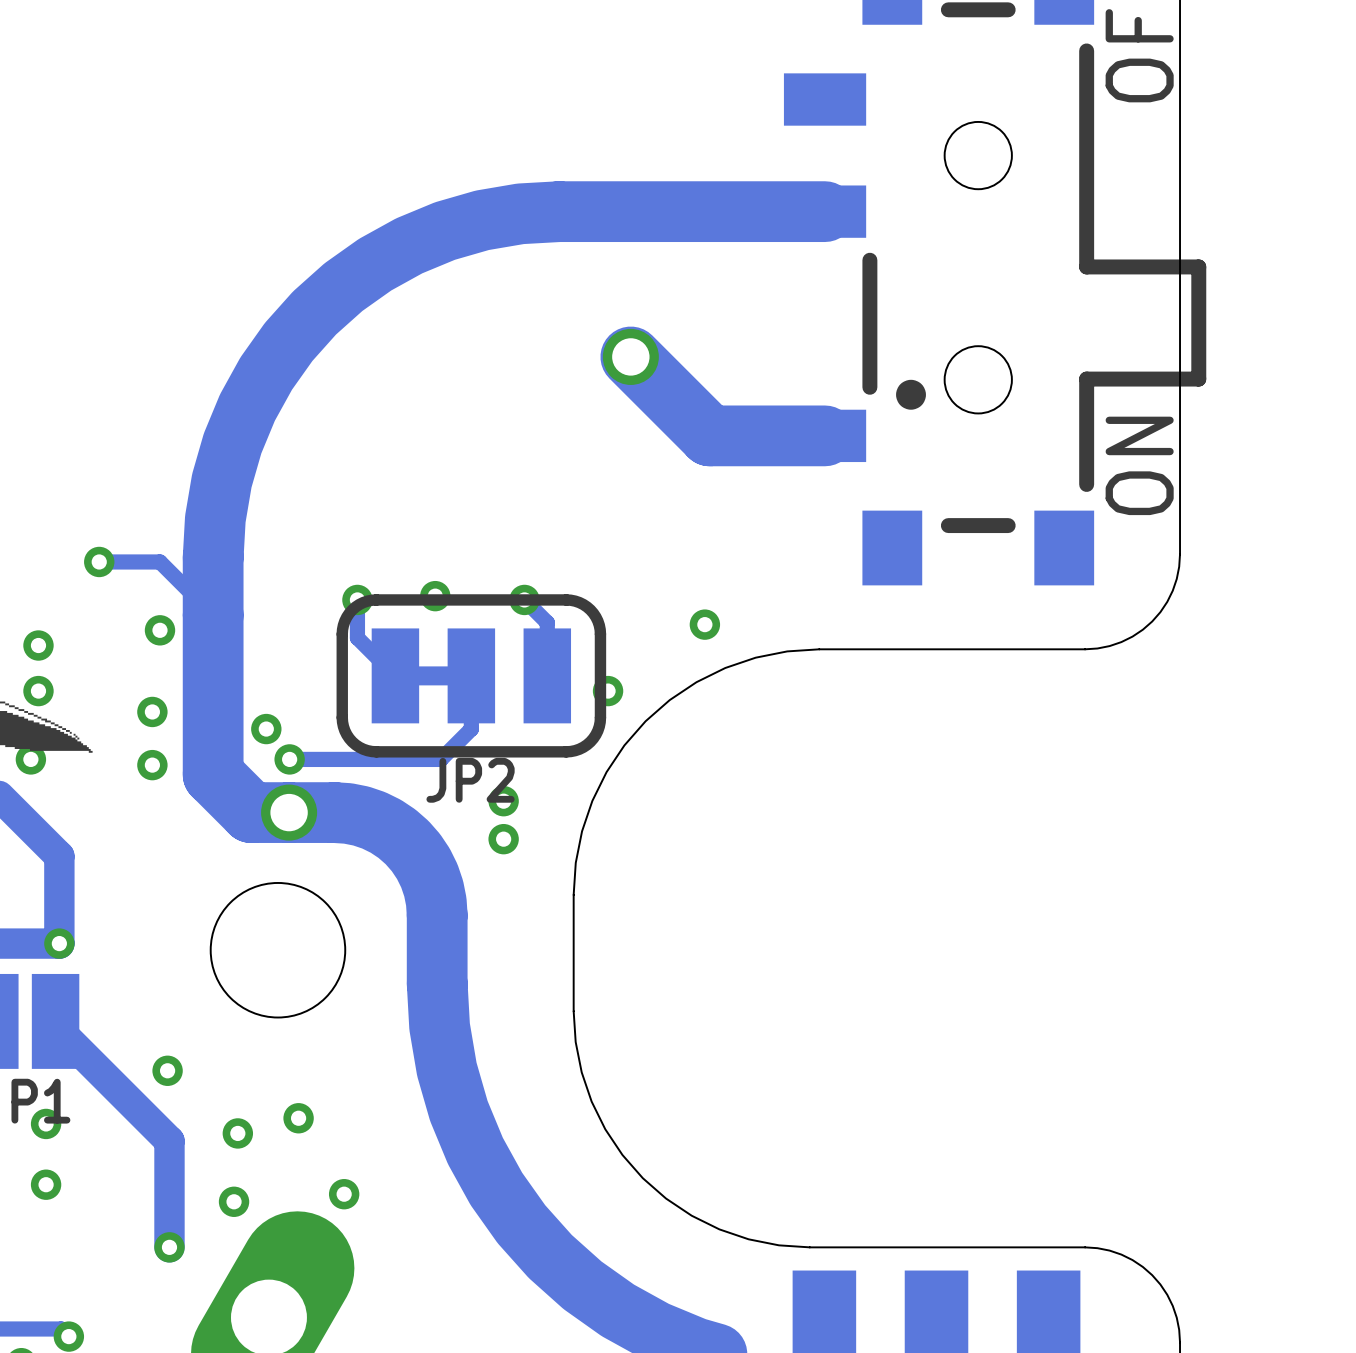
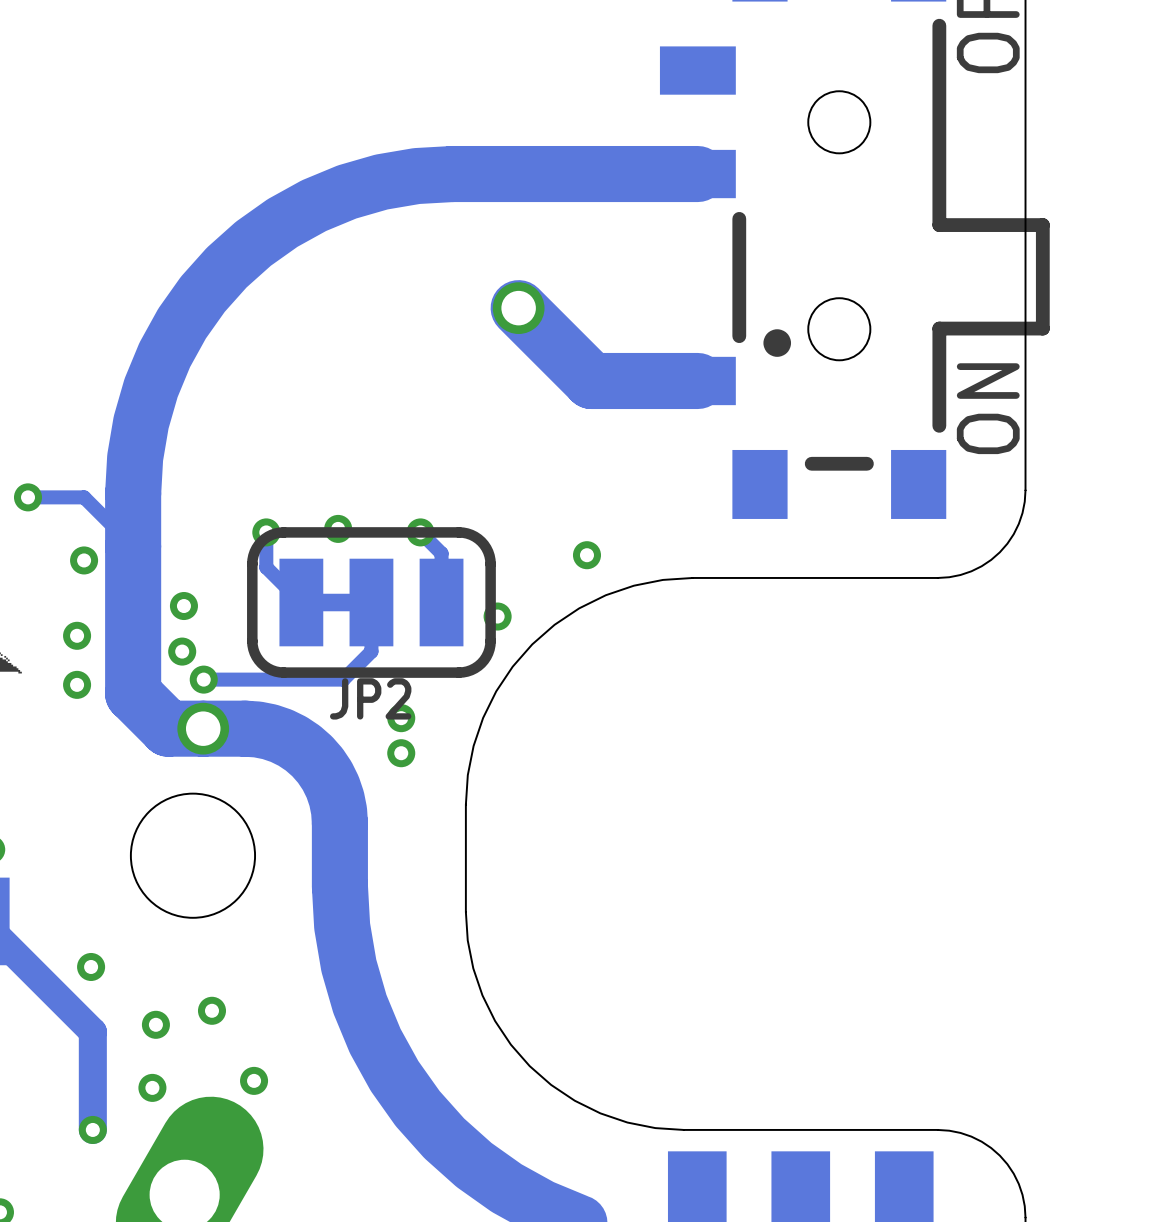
via: none -> (183, 606)

